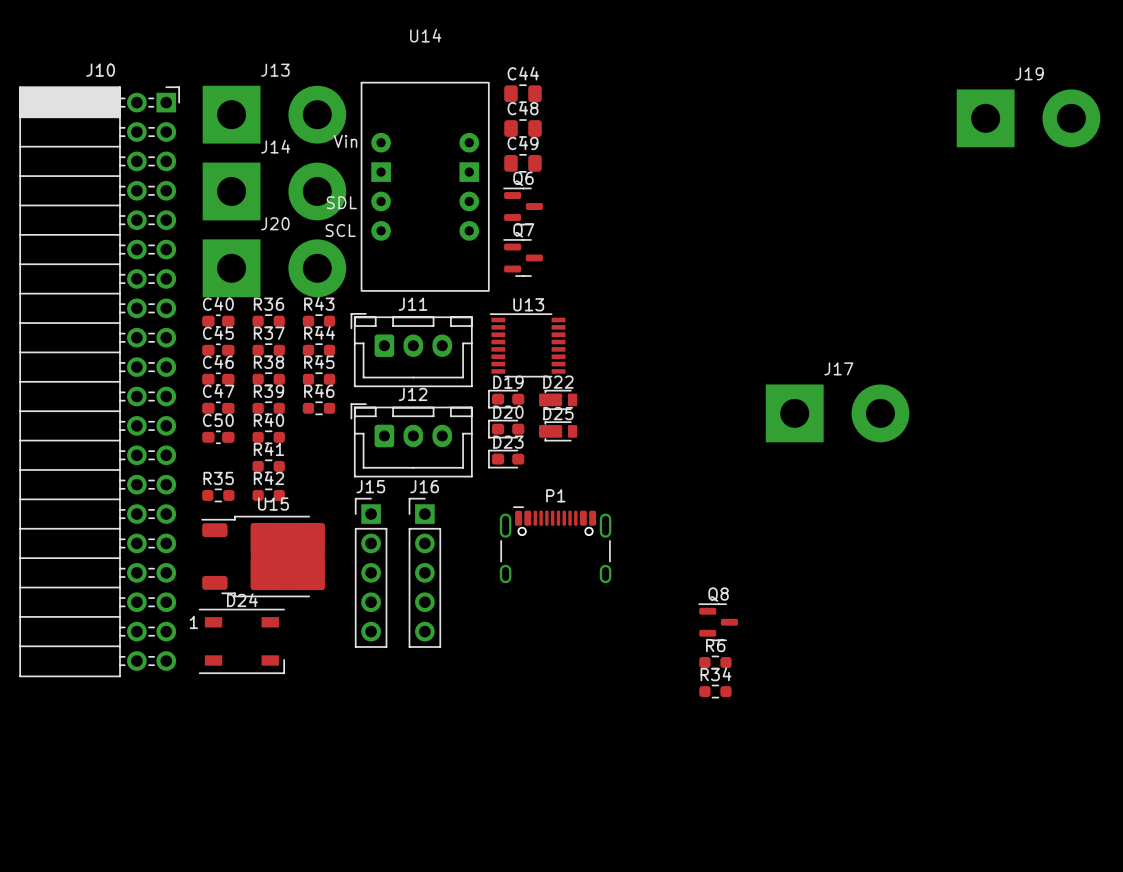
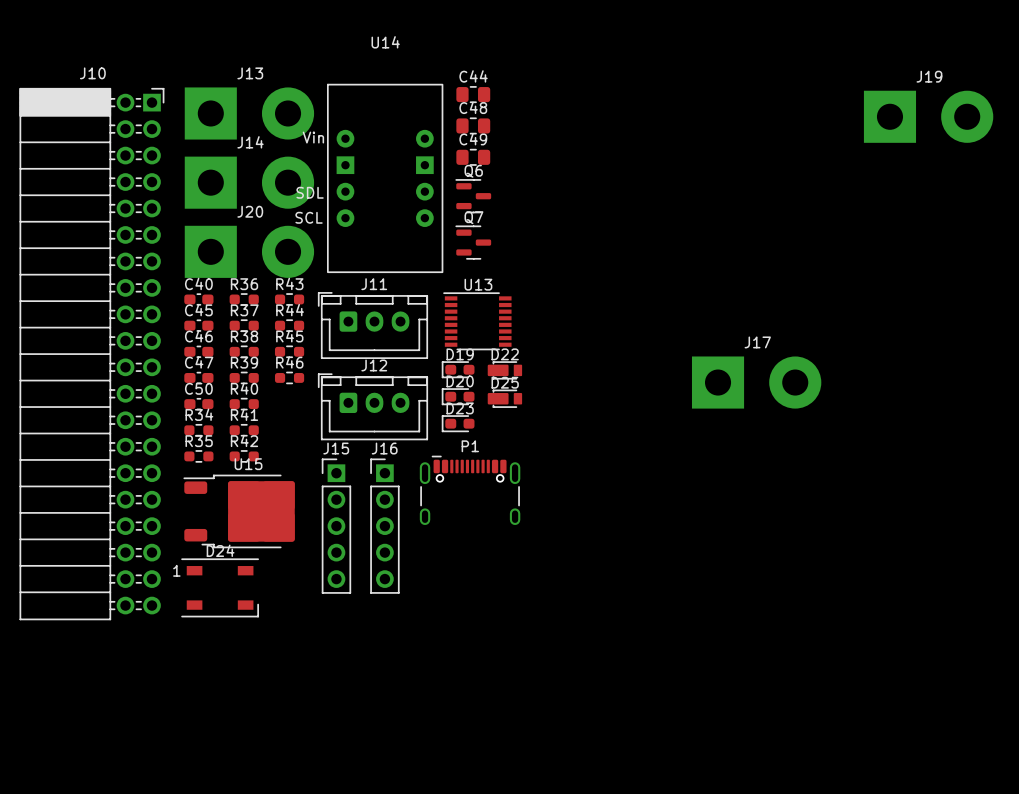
P1 position: (555, 544) -> (470, 490)
Q8: (718, 622) -> none
R6: (715, 662) -> none
R34 position: (715, 691) -> (198, 430)

